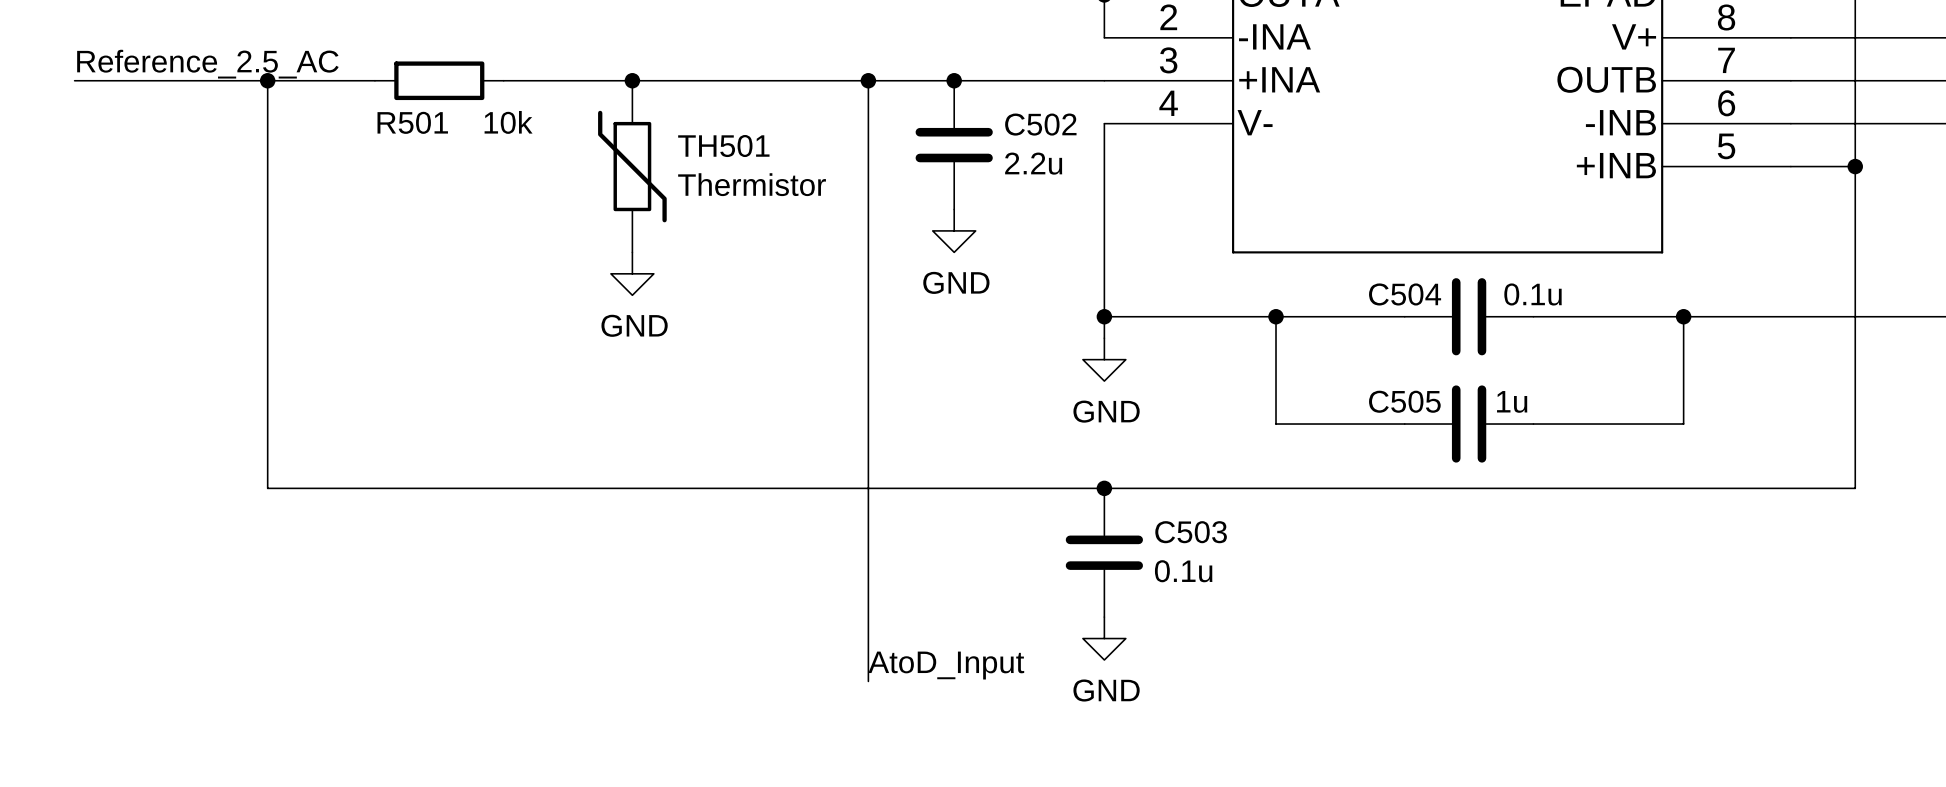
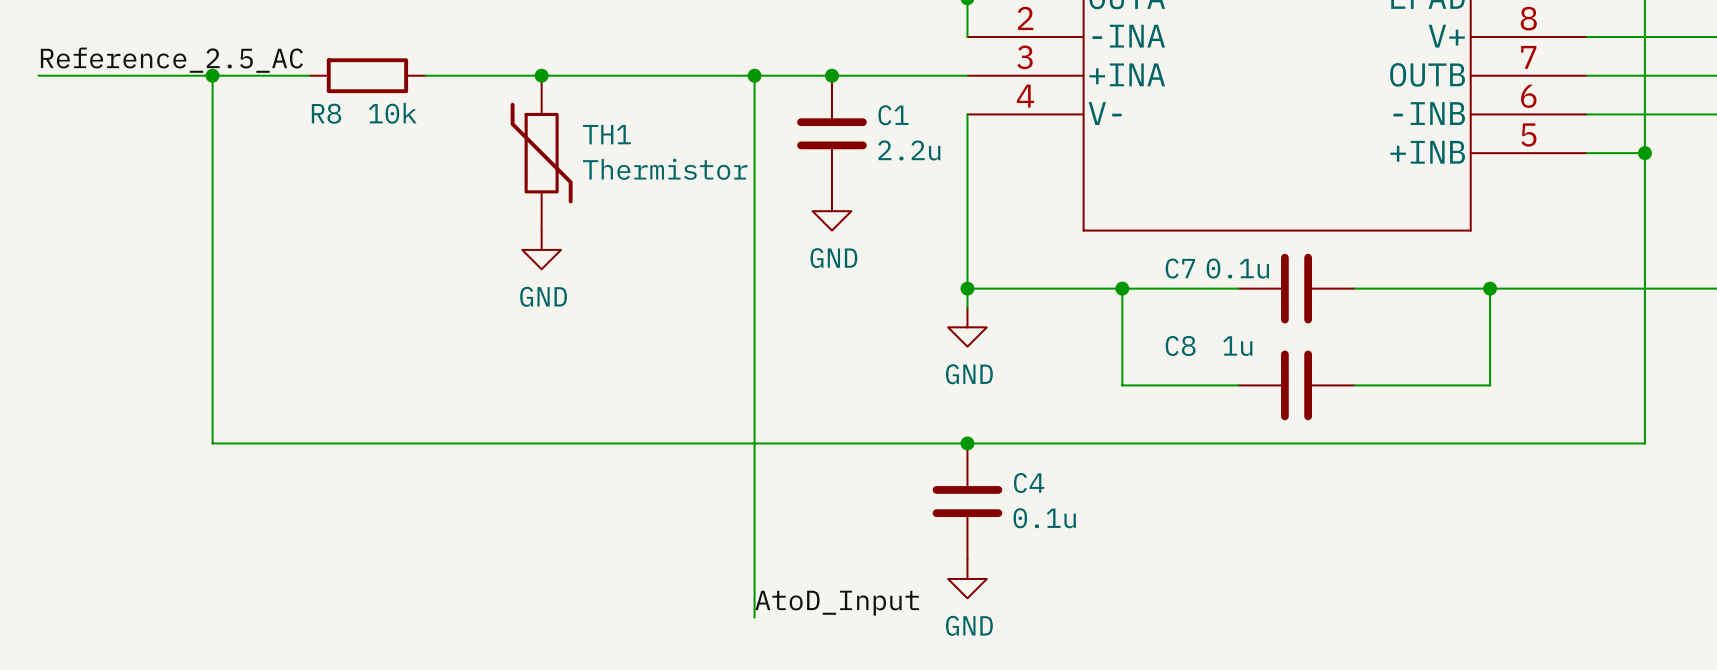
R501 name: R501 (412, 122) -> R8 (326, 113)
R501 value position: 10k (508, 122) -> 10k (392, 113)
C502 name: C502 (1040, 124) -> C1 (893, 115)
TH501 name: TH501 (723, 146) -> TH1 (606, 134)
C504 name: C504 (1405, 294) -> C7 (1180, 268)
C504 value position: 0.1u (1533, 294) -> 0.1u (1237, 268)
C505 name: C505 (1404, 401) -> C8 (1180, 345)
C505 value position: 1u (1512, 401) -> 1u (1237, 346)
C503 name: C503 (1191, 532) -> C4 (1029, 483)

